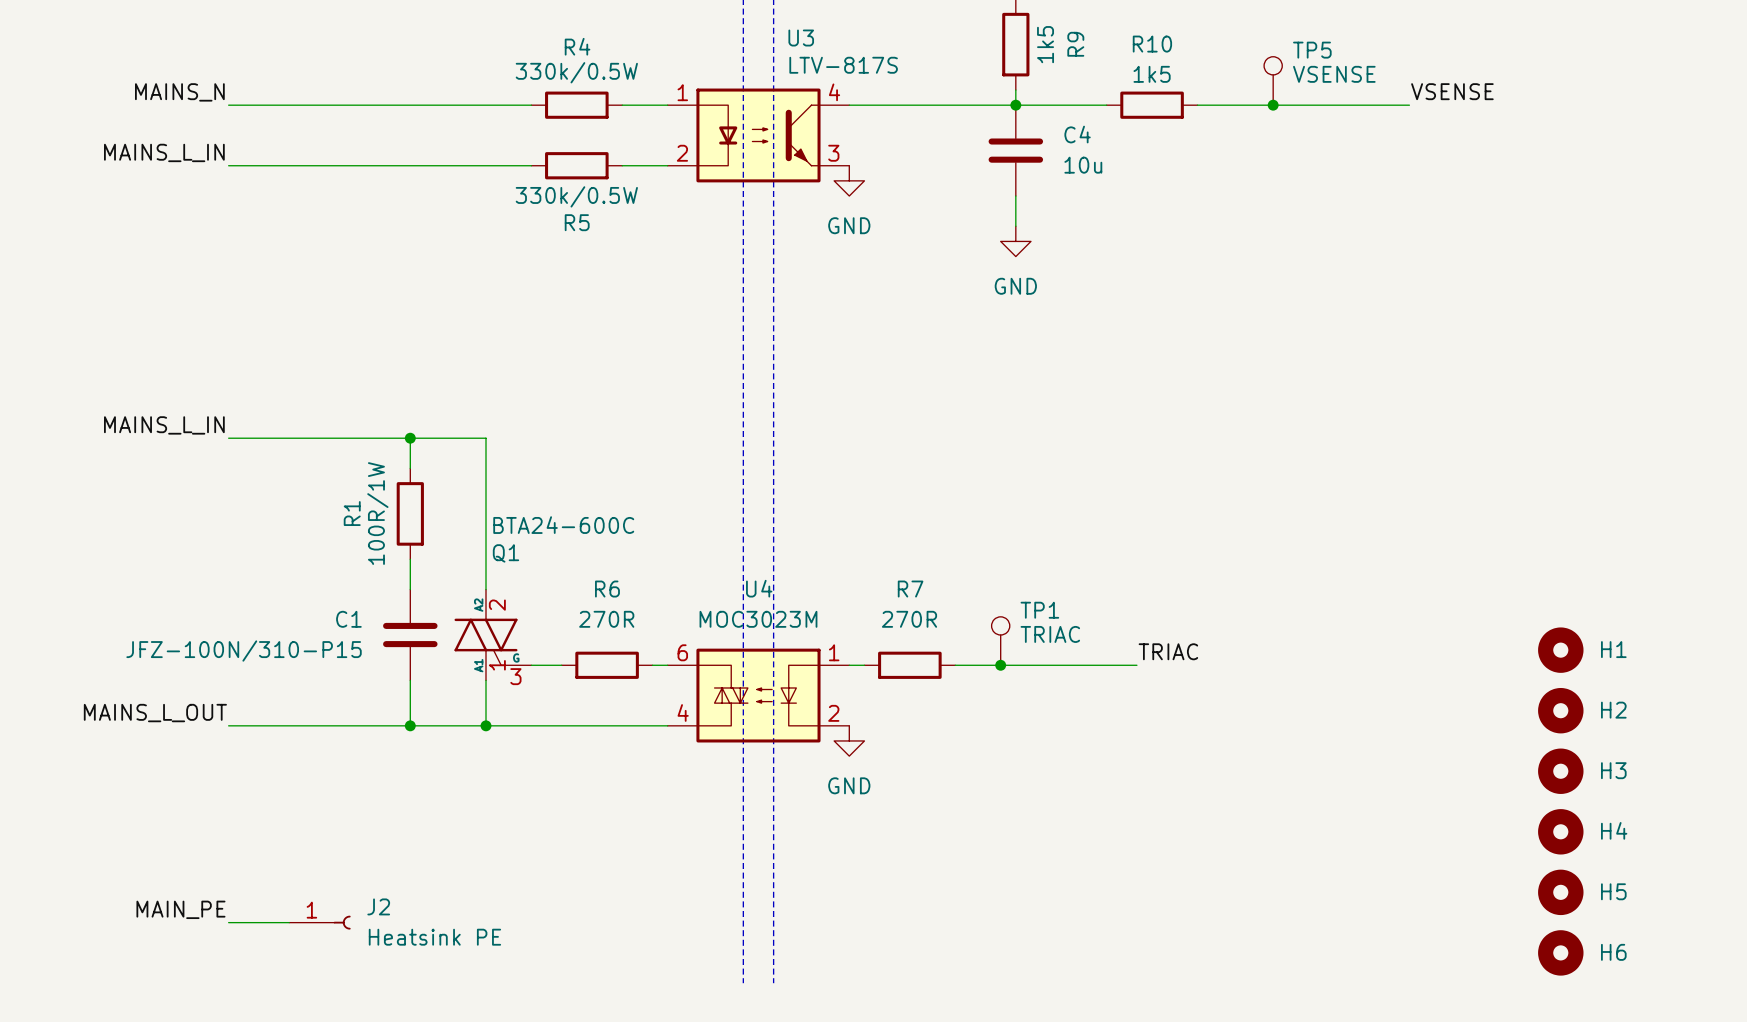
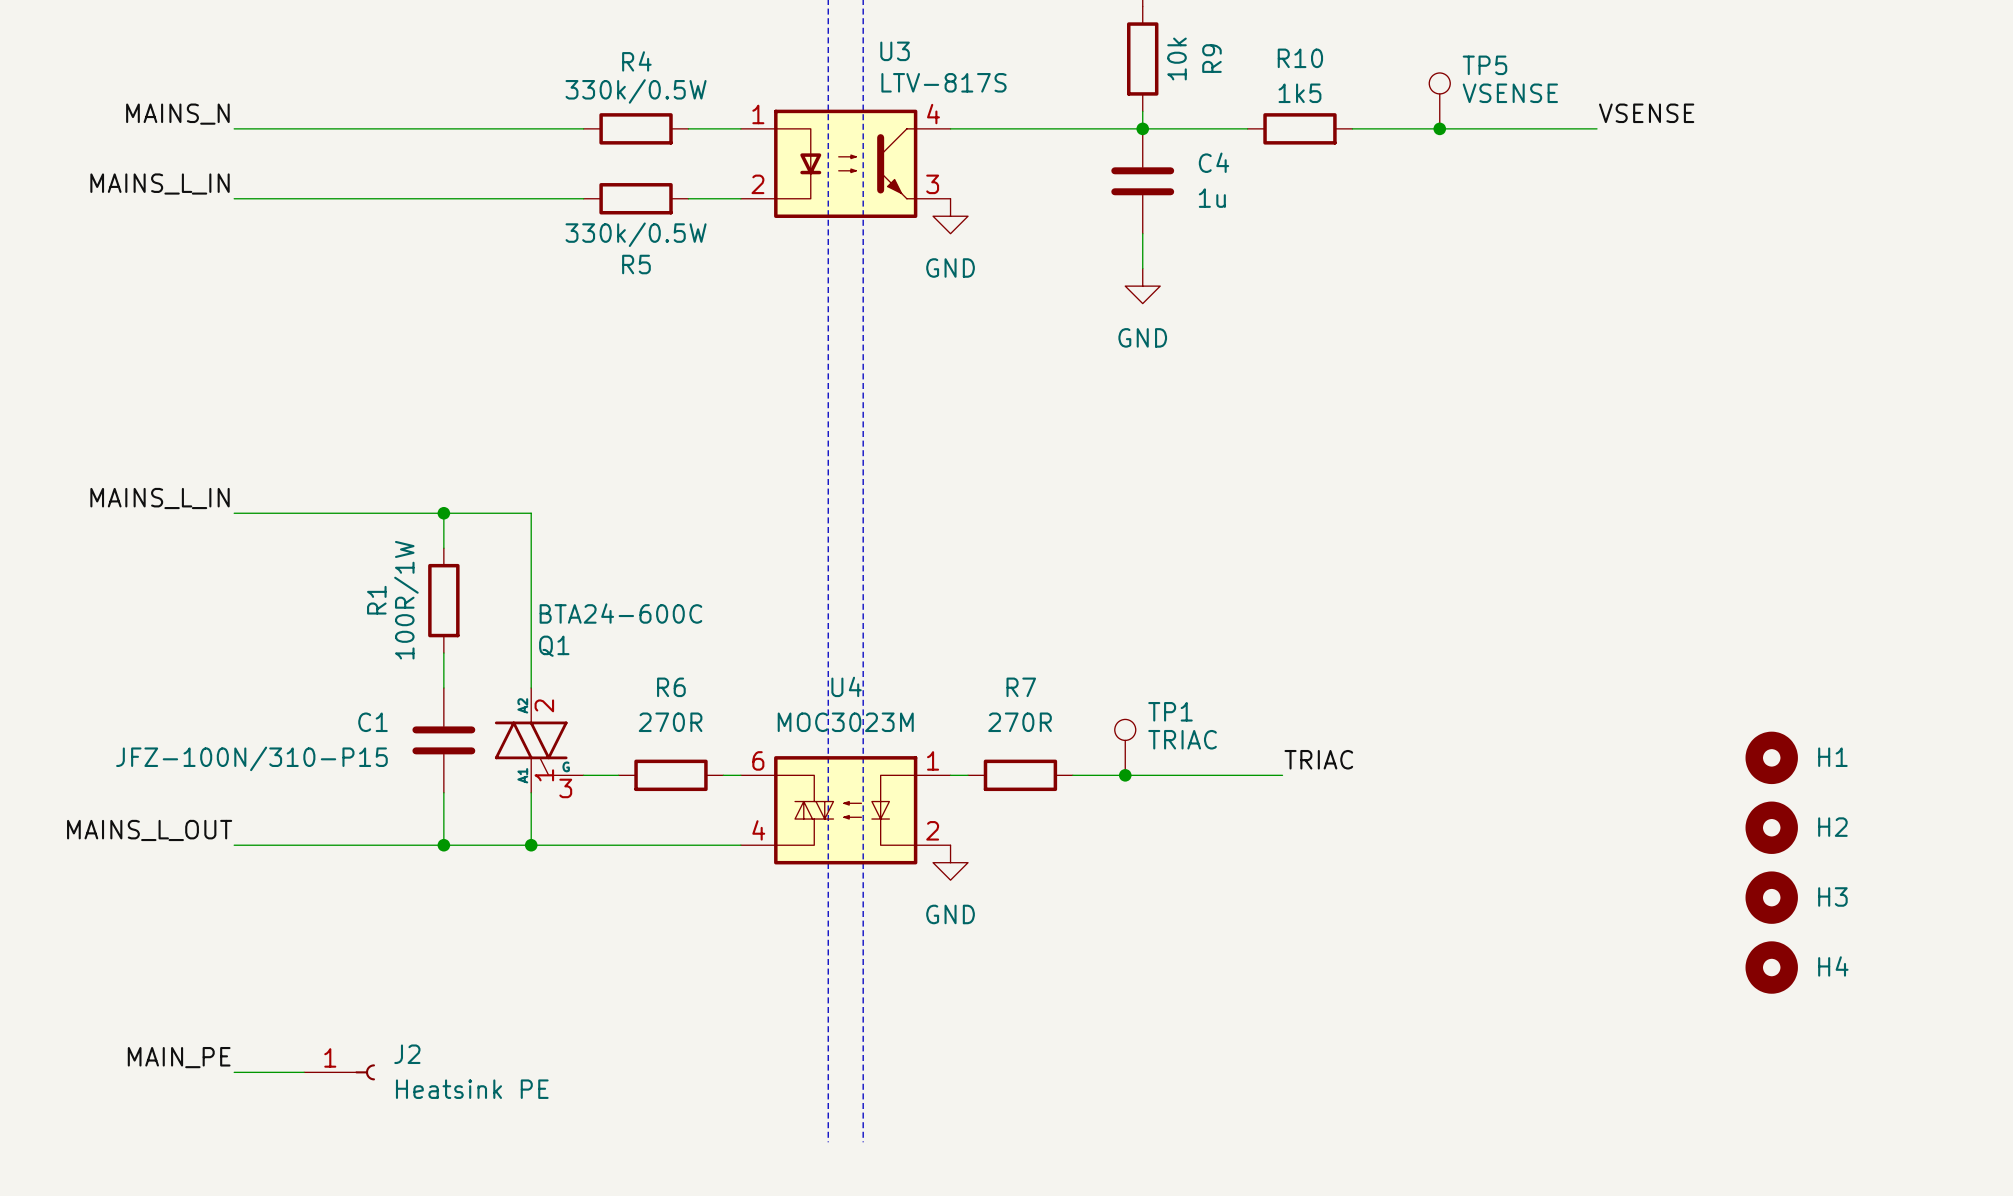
R9 value: 1k5 (1045, 44) -> 10k (1177, 58)
C4 value: 10u (1083, 165) -> 1u (1212, 198)
H5: (1560, 892) -> none
H6: (1560, 952) -> none

